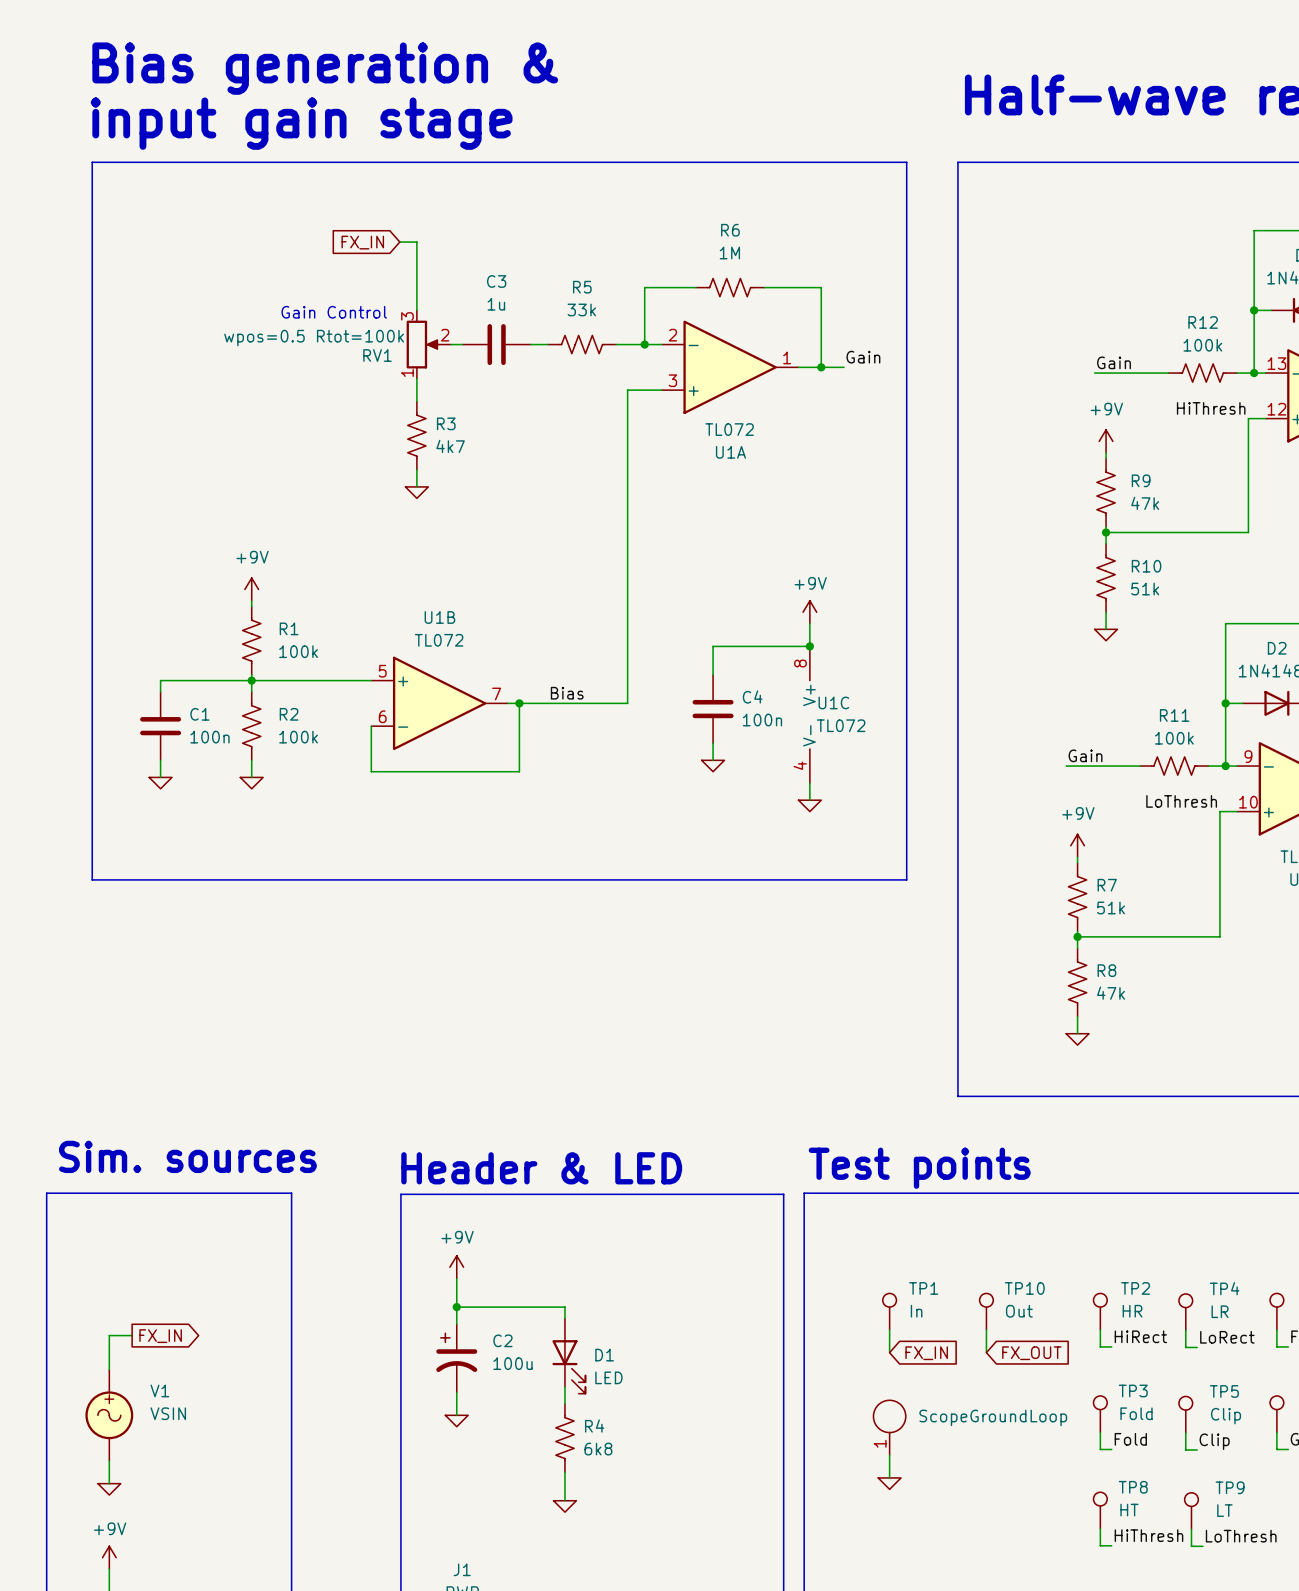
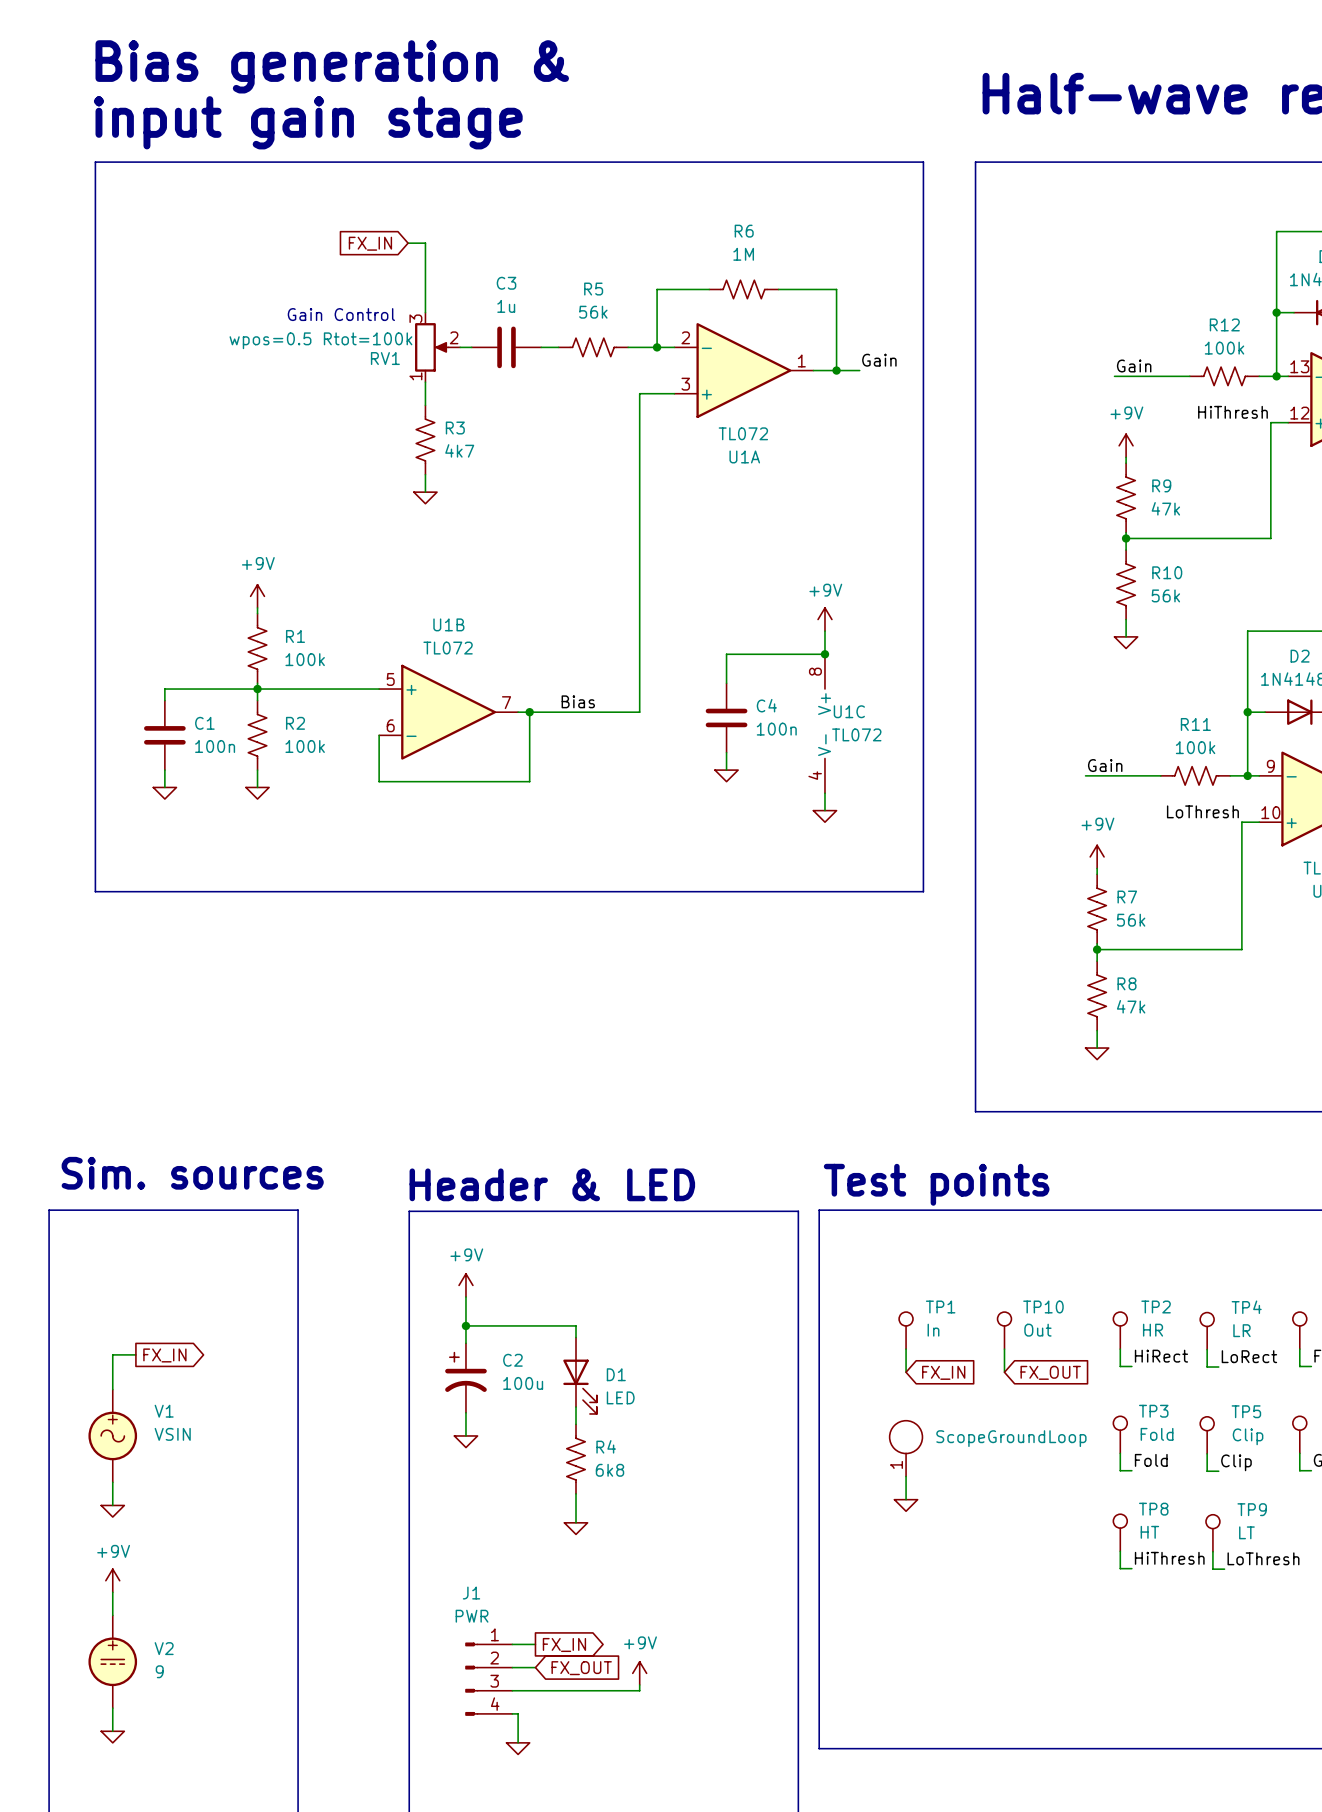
R5 value: 33k (581, 309) -> 56k (593, 312)
R10 value: 51k (1145, 589) -> 56k (1165, 595)
R7 value: 51k (1111, 907) -> 56k (1131, 920)

